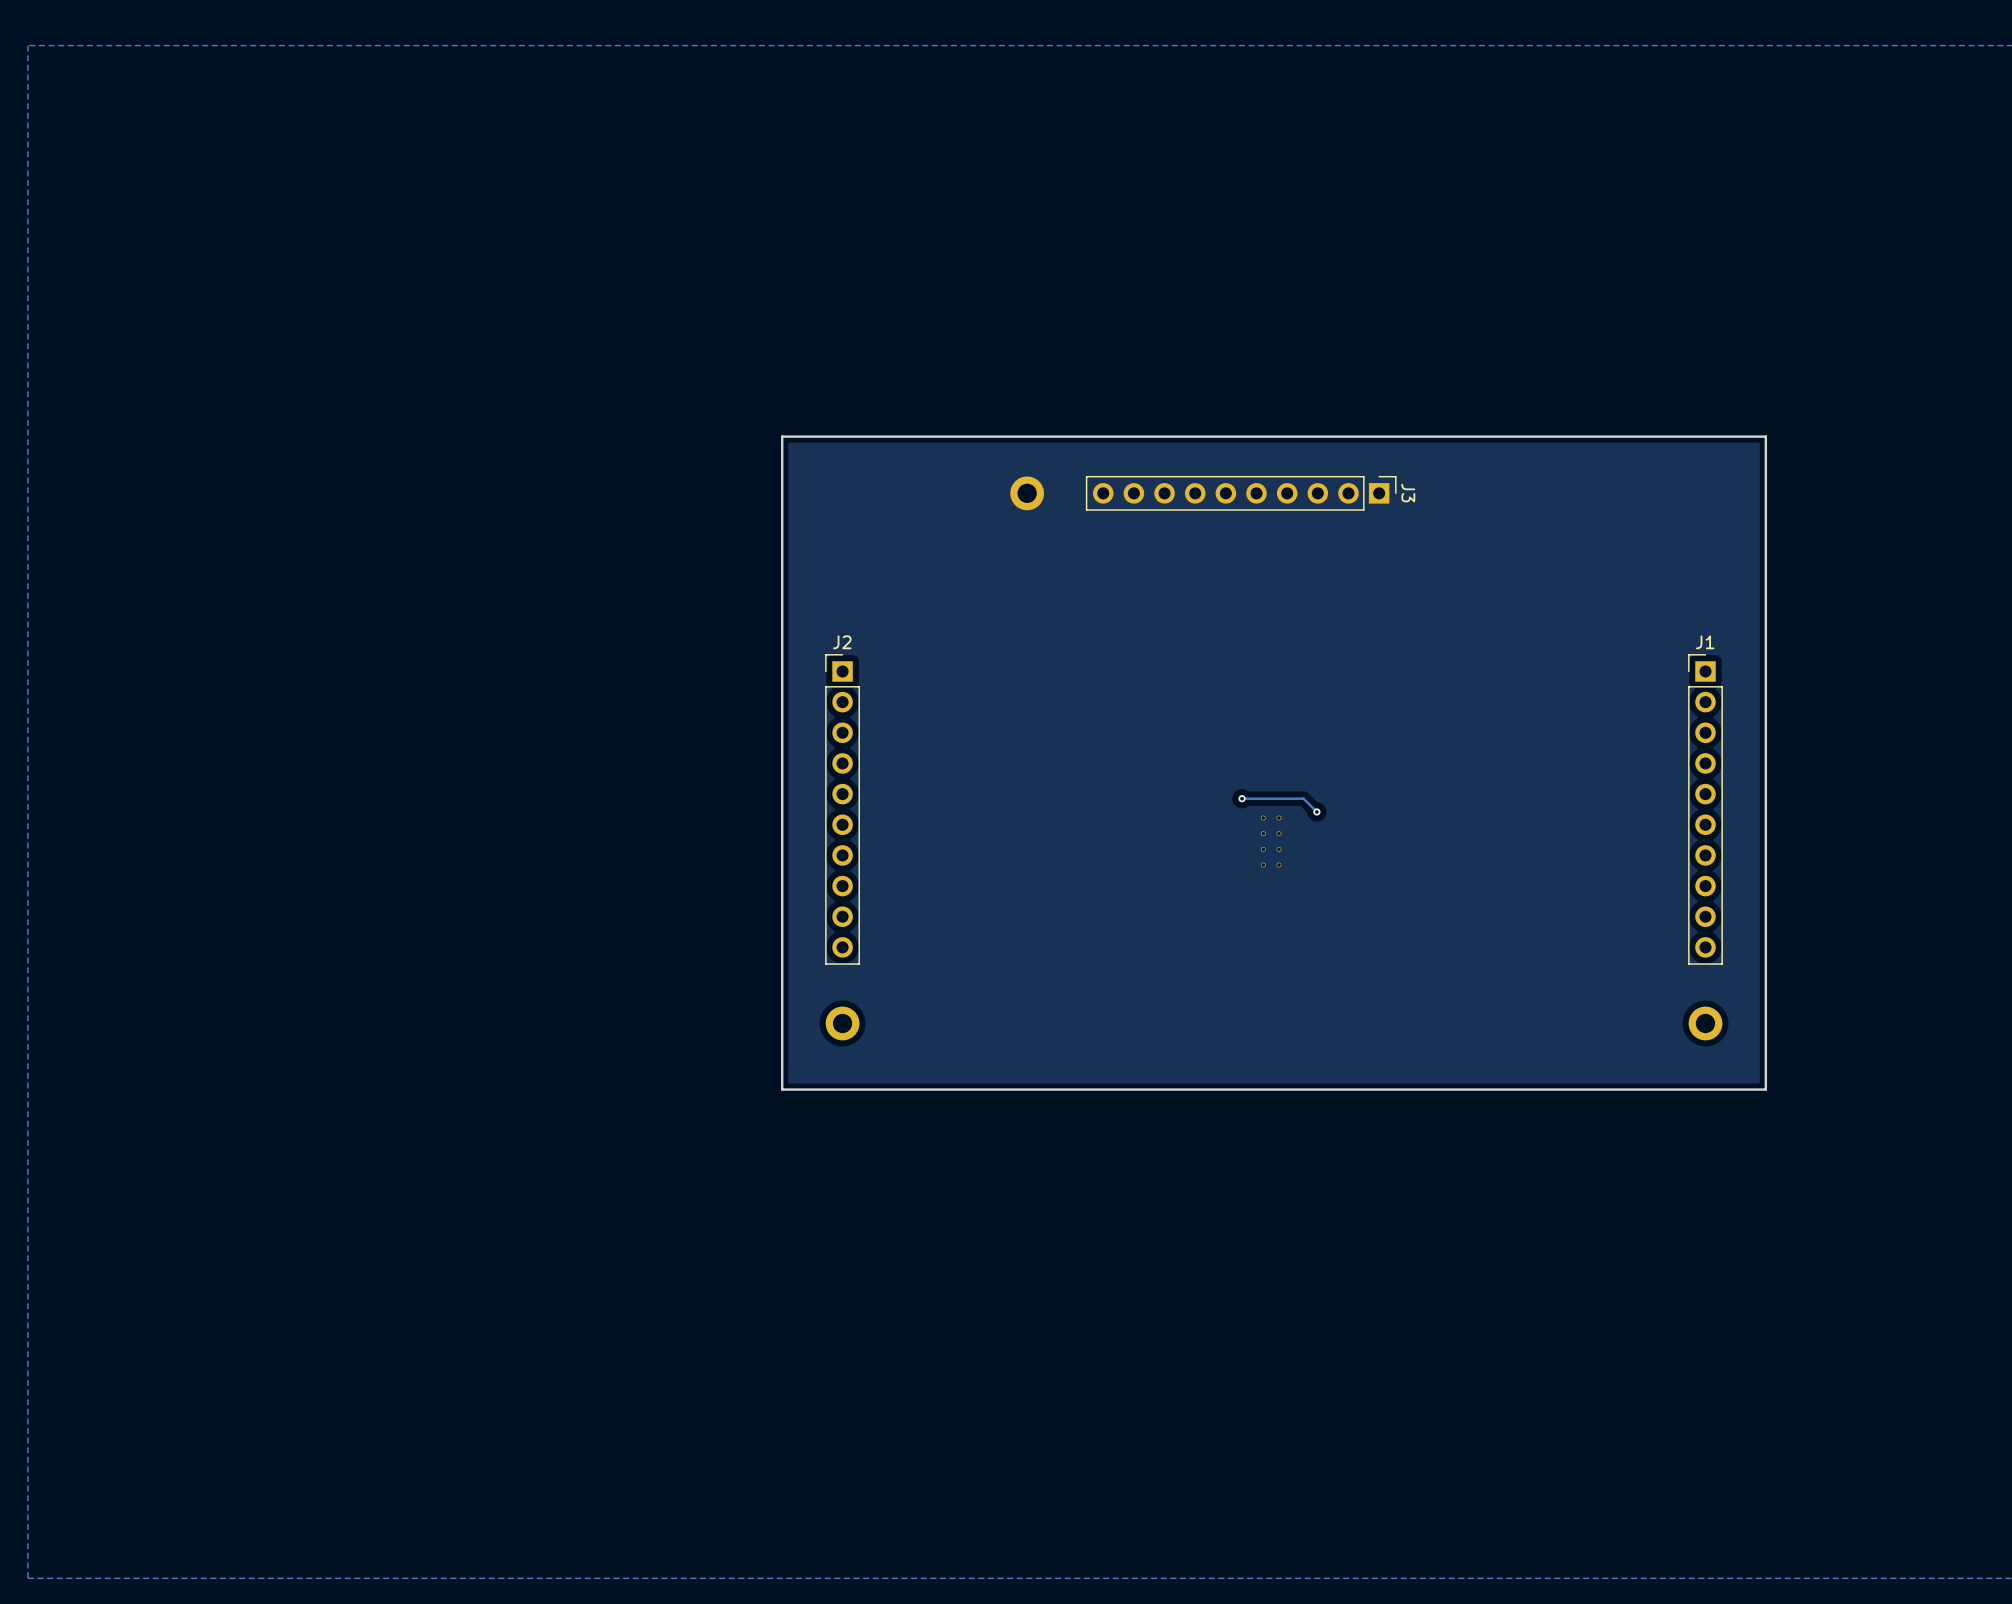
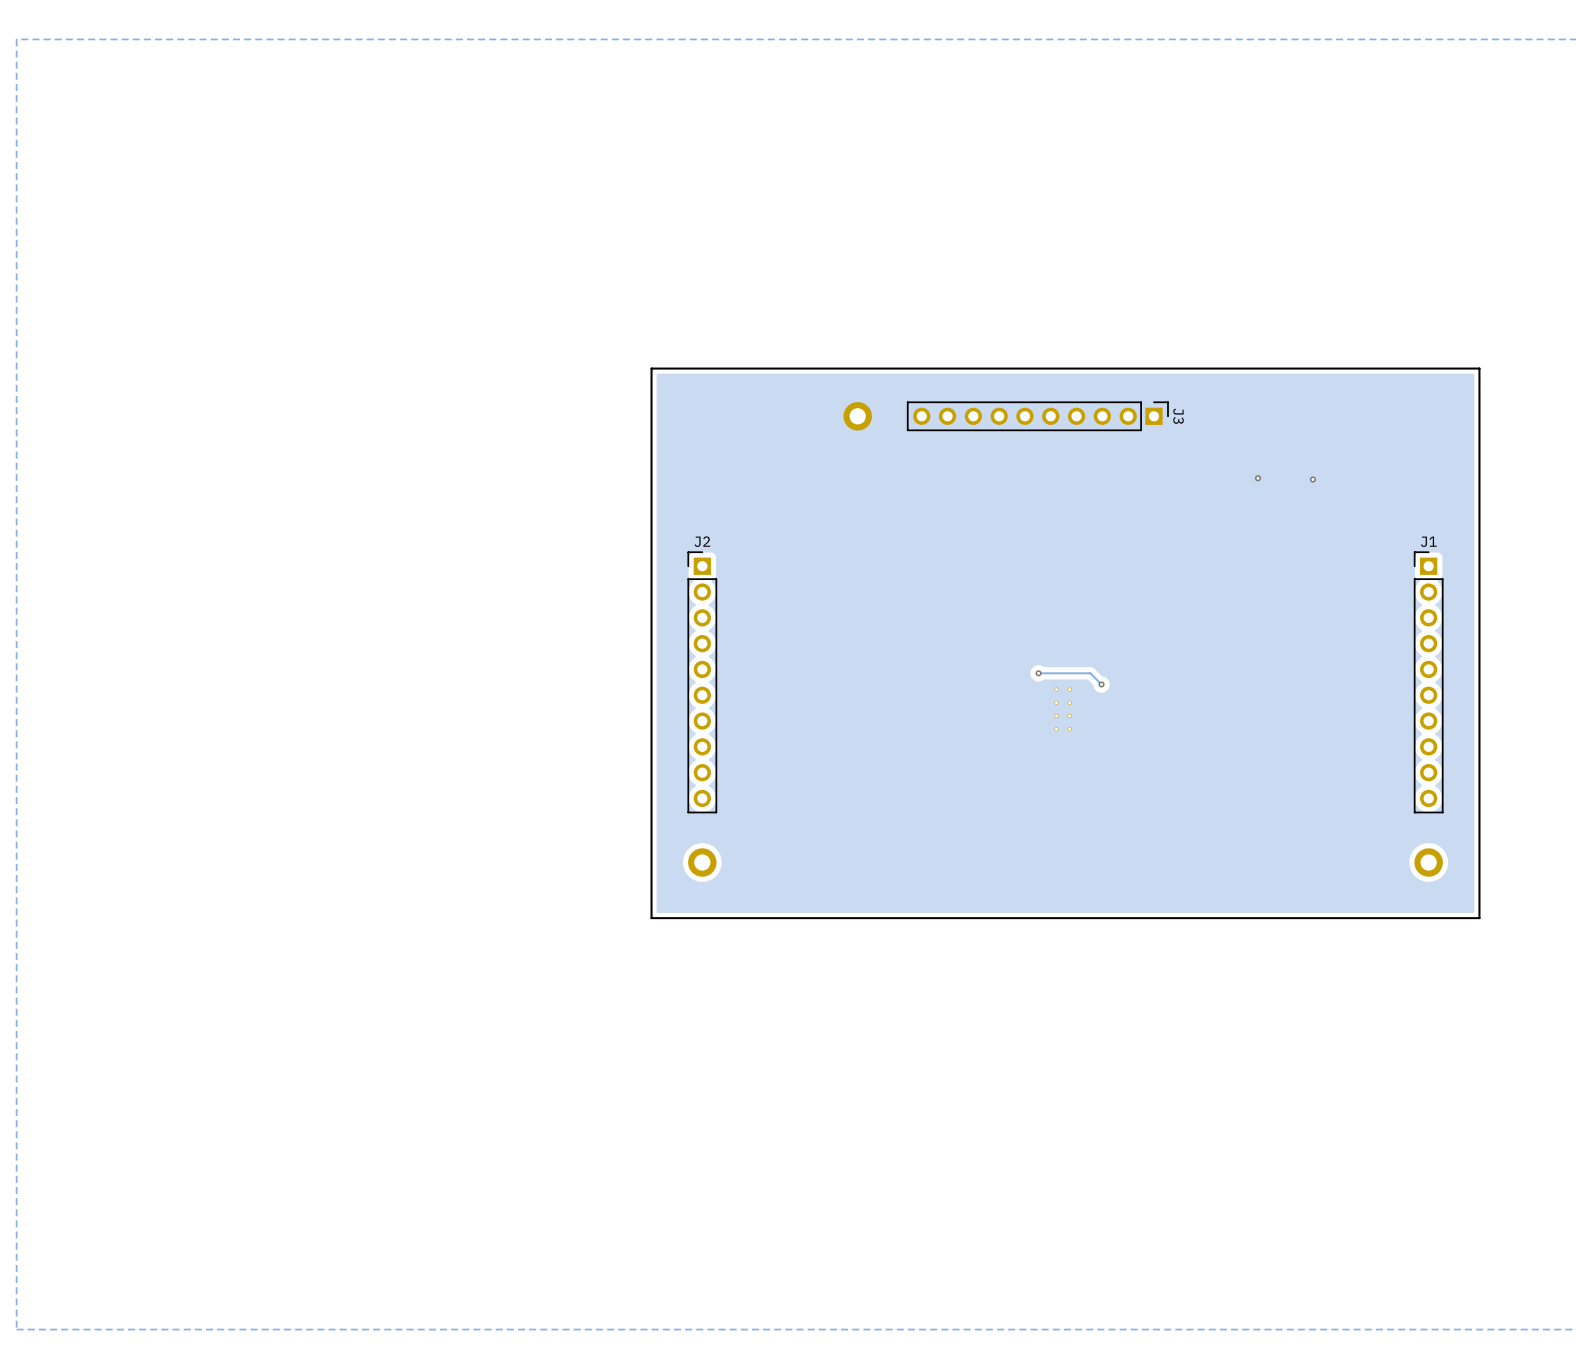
via: none -> (1258, 478)
via: none -> (1312, 479)

